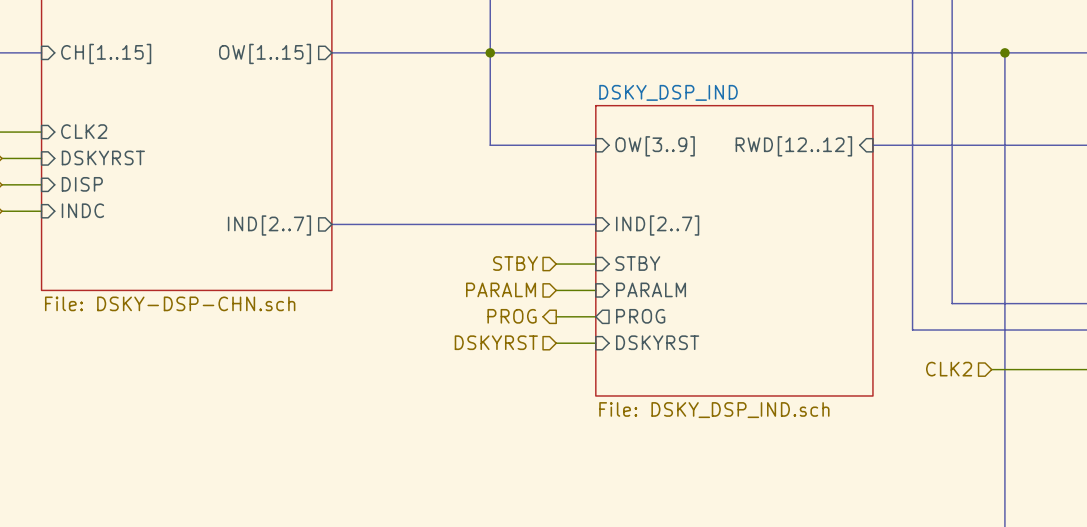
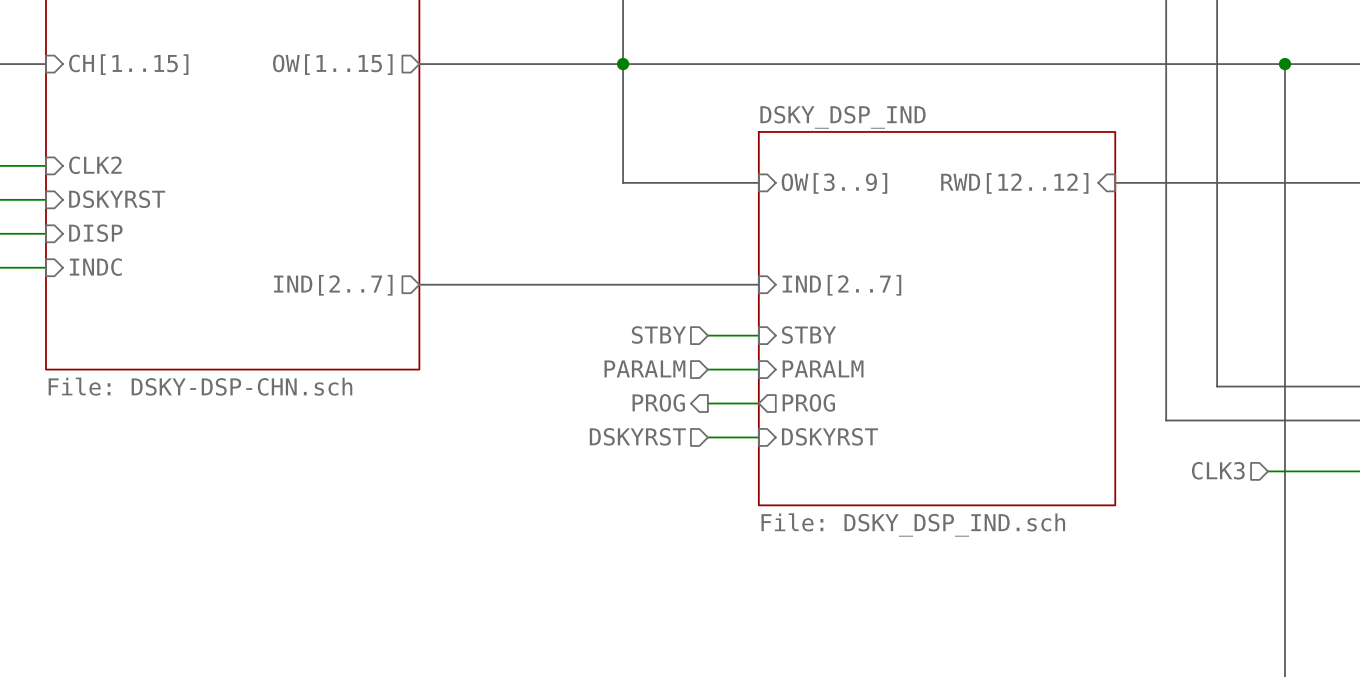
hierarchical label: CLK2 (949, 369) -> CLK3 (1218, 470)

